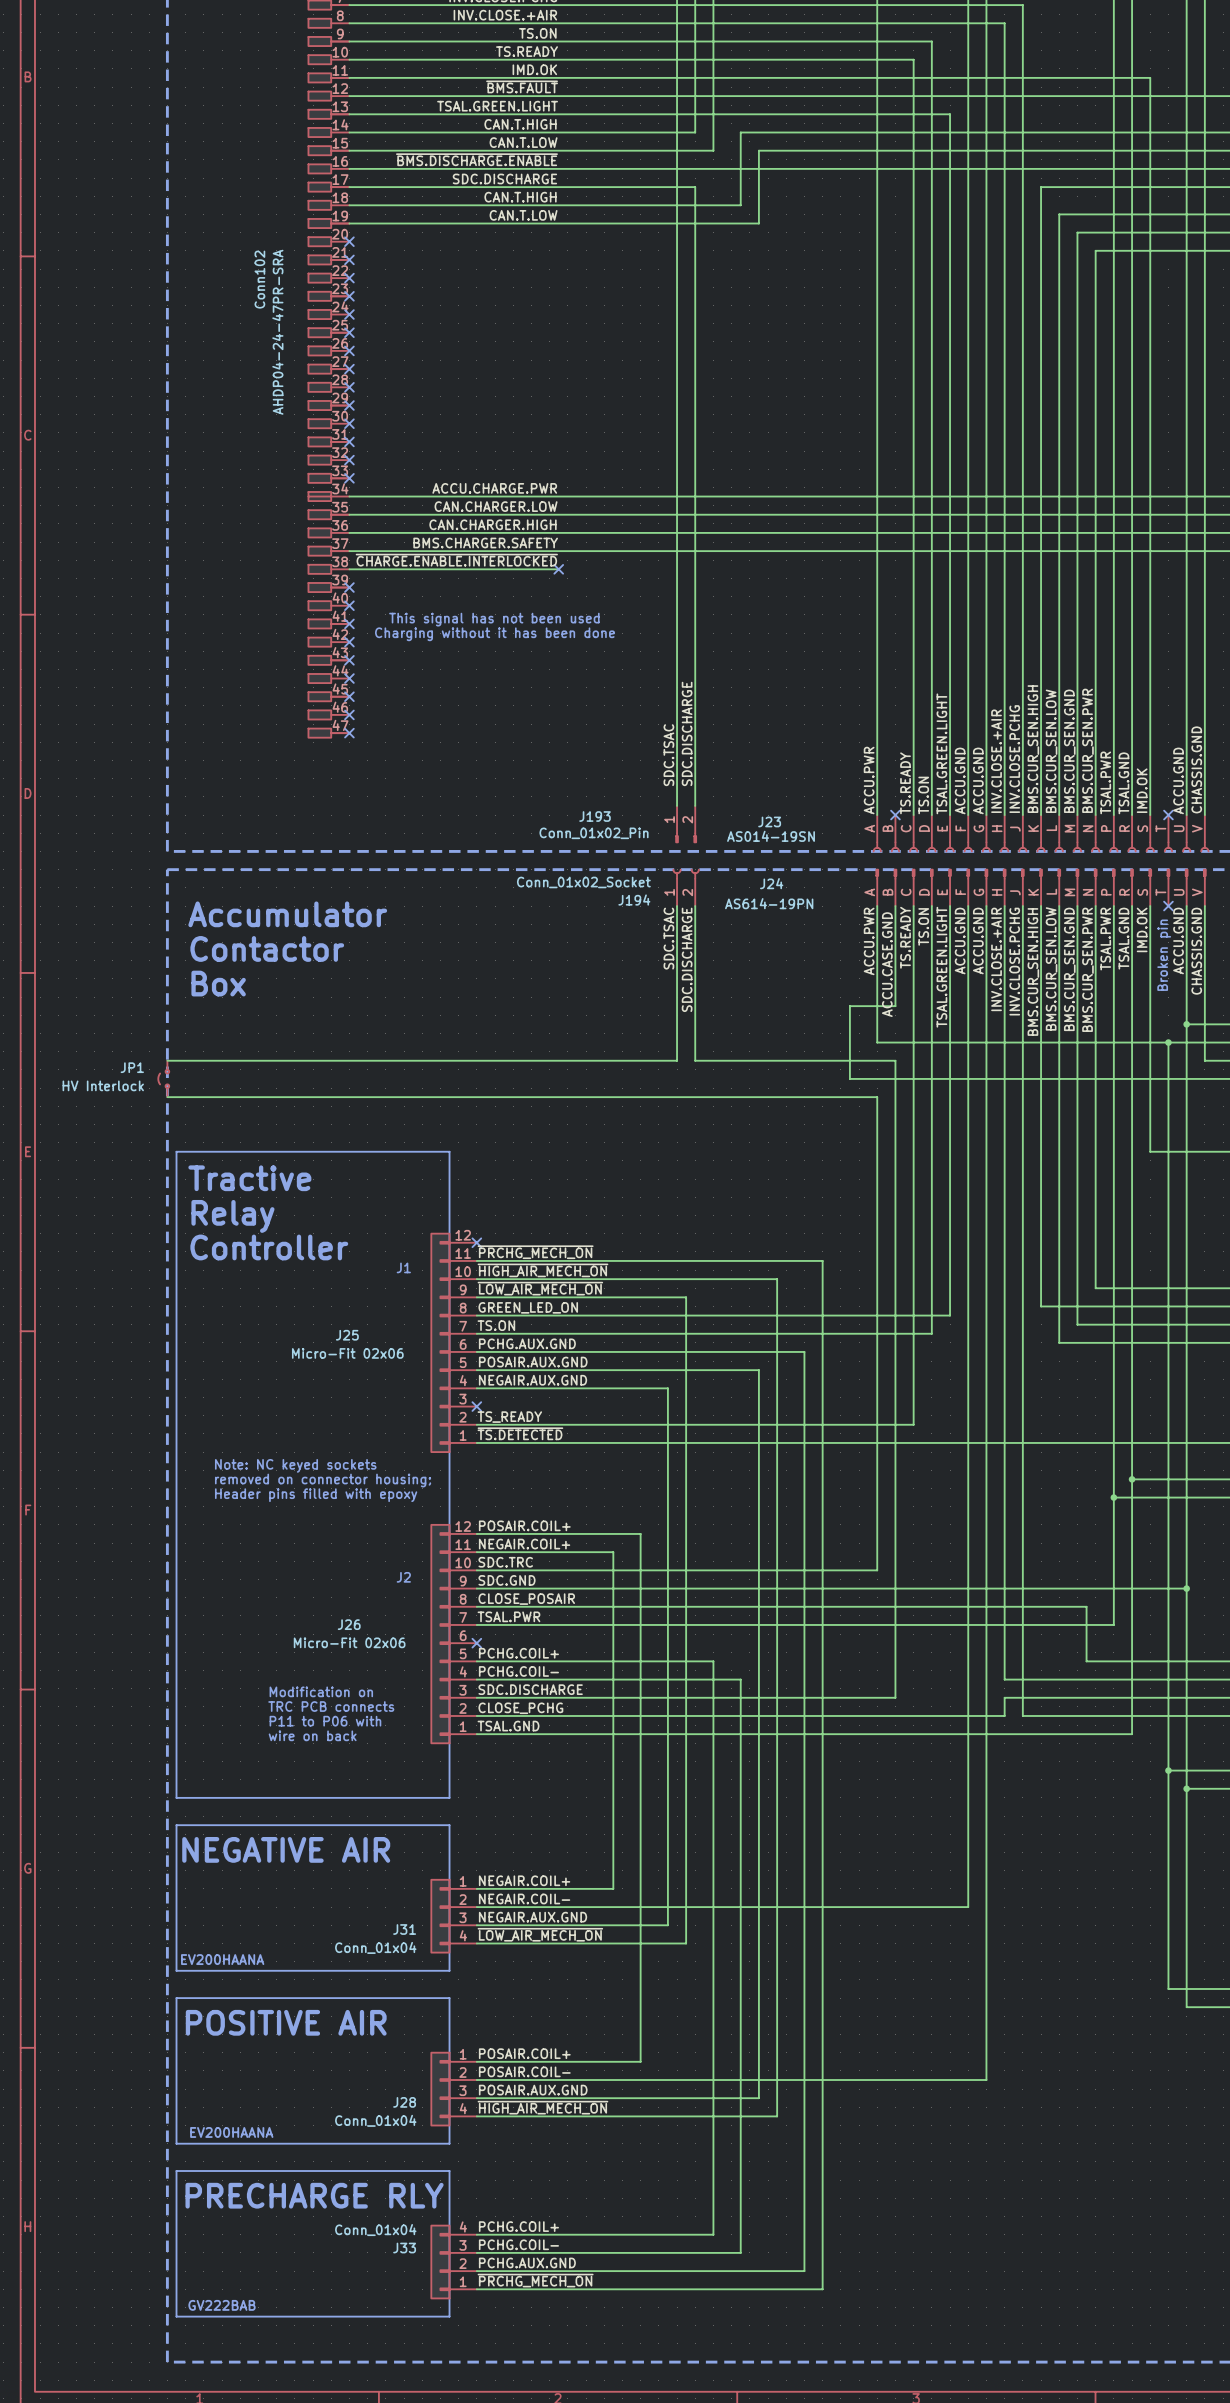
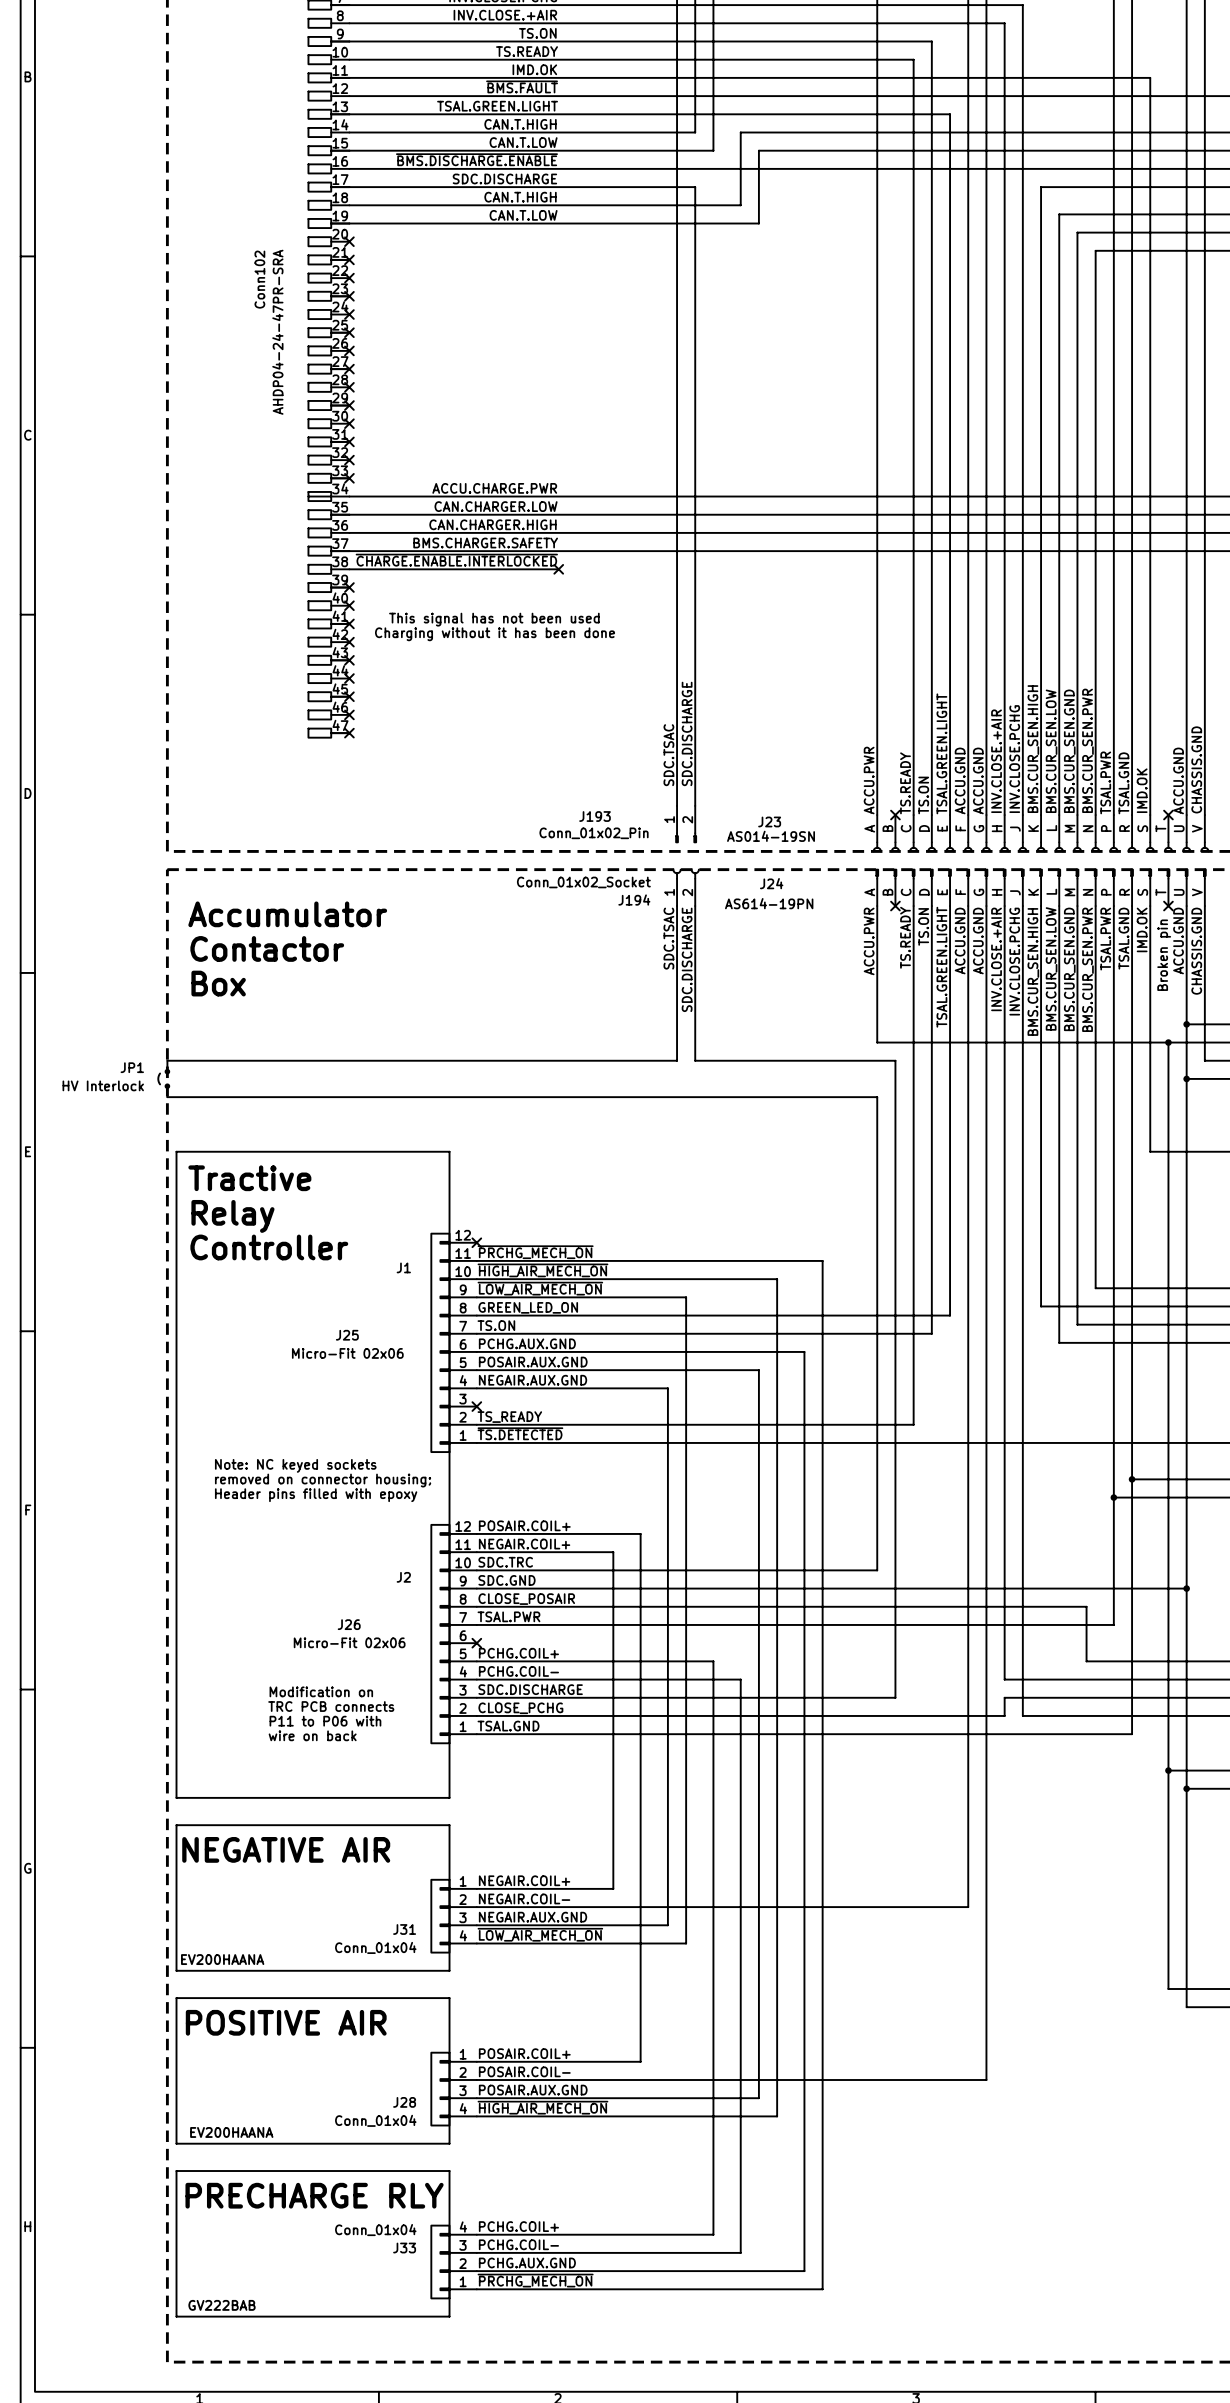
wire: (895, 906) (895, 1006) (849, 1006) (849, 1078) (1186, 1078) -> none
no-connect mark: none -> (895, 906)
label: ACCU.CASE.GND (887, 964) -> none
junction: none -> (1186, 1078)

